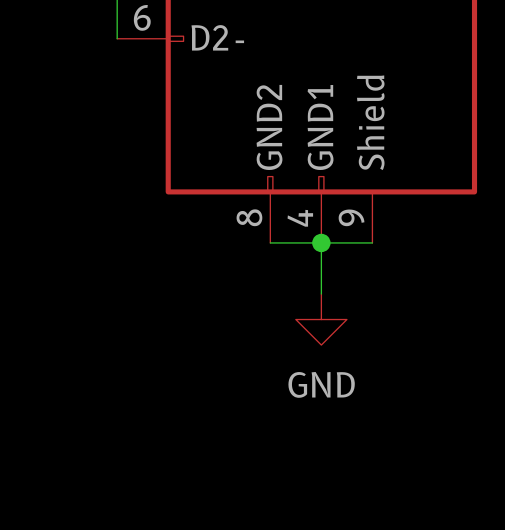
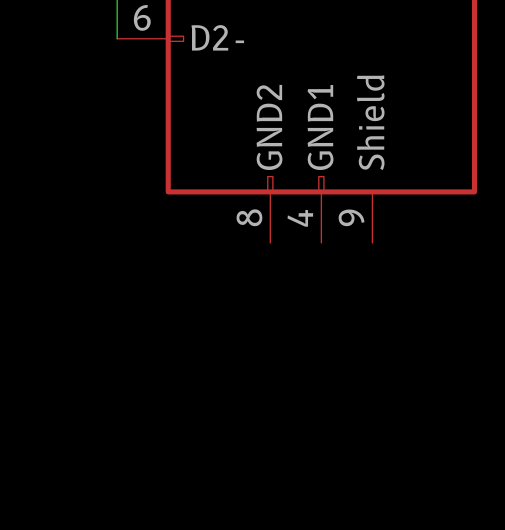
wire: (270, 242) (372, 242) -> none
wire: (321, 242) (321, 294) -> none
junction: (321, 242) -> none
power symbol: GND (321, 319) -> none

